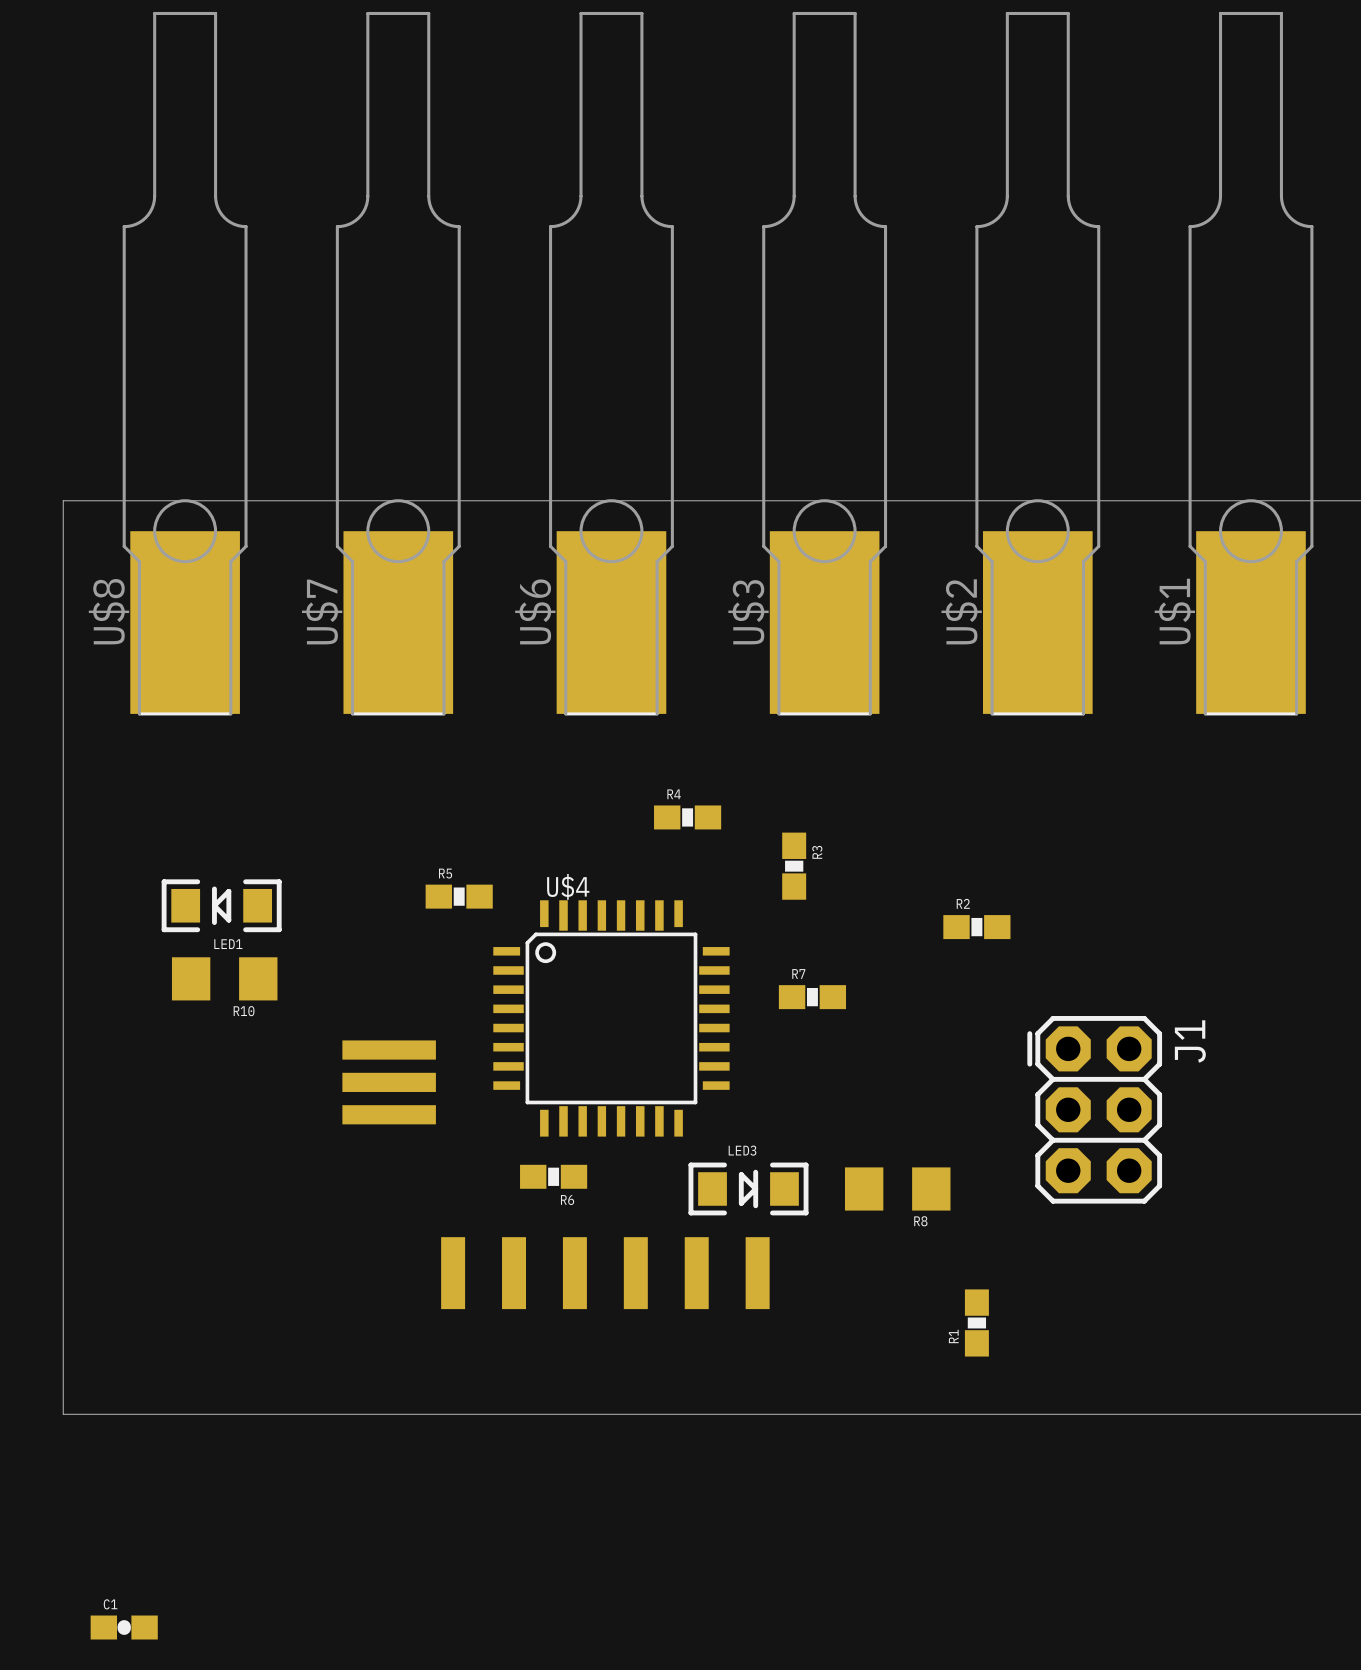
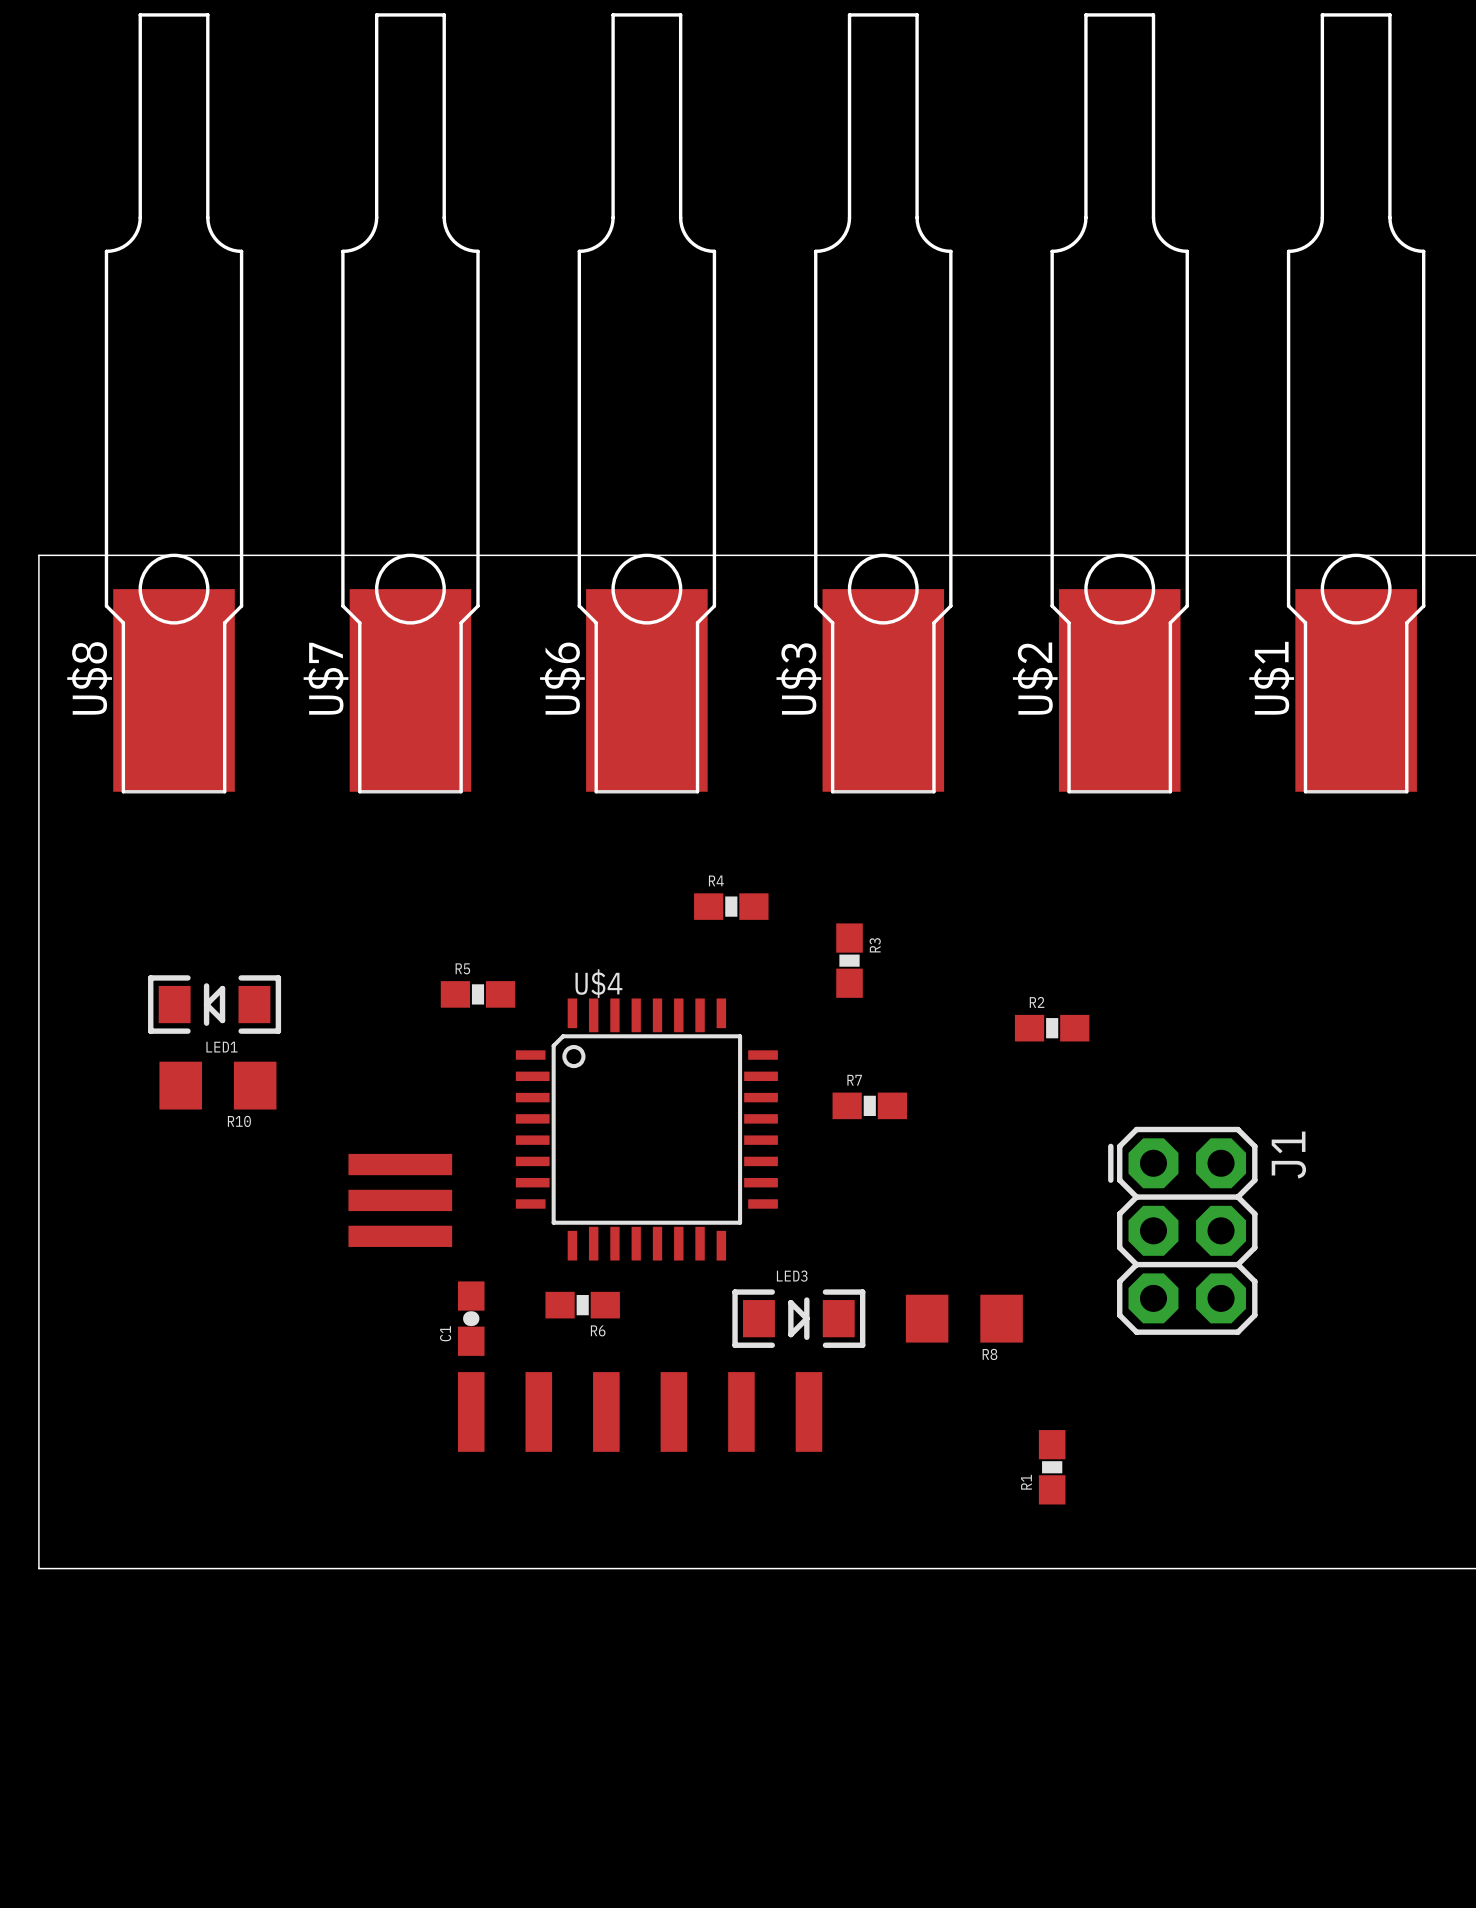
C1 rotation: 0° (124, 1627) -> 90° clockwise (471, 1318)
C1 position: (124, 1627) -> (471, 1318)

